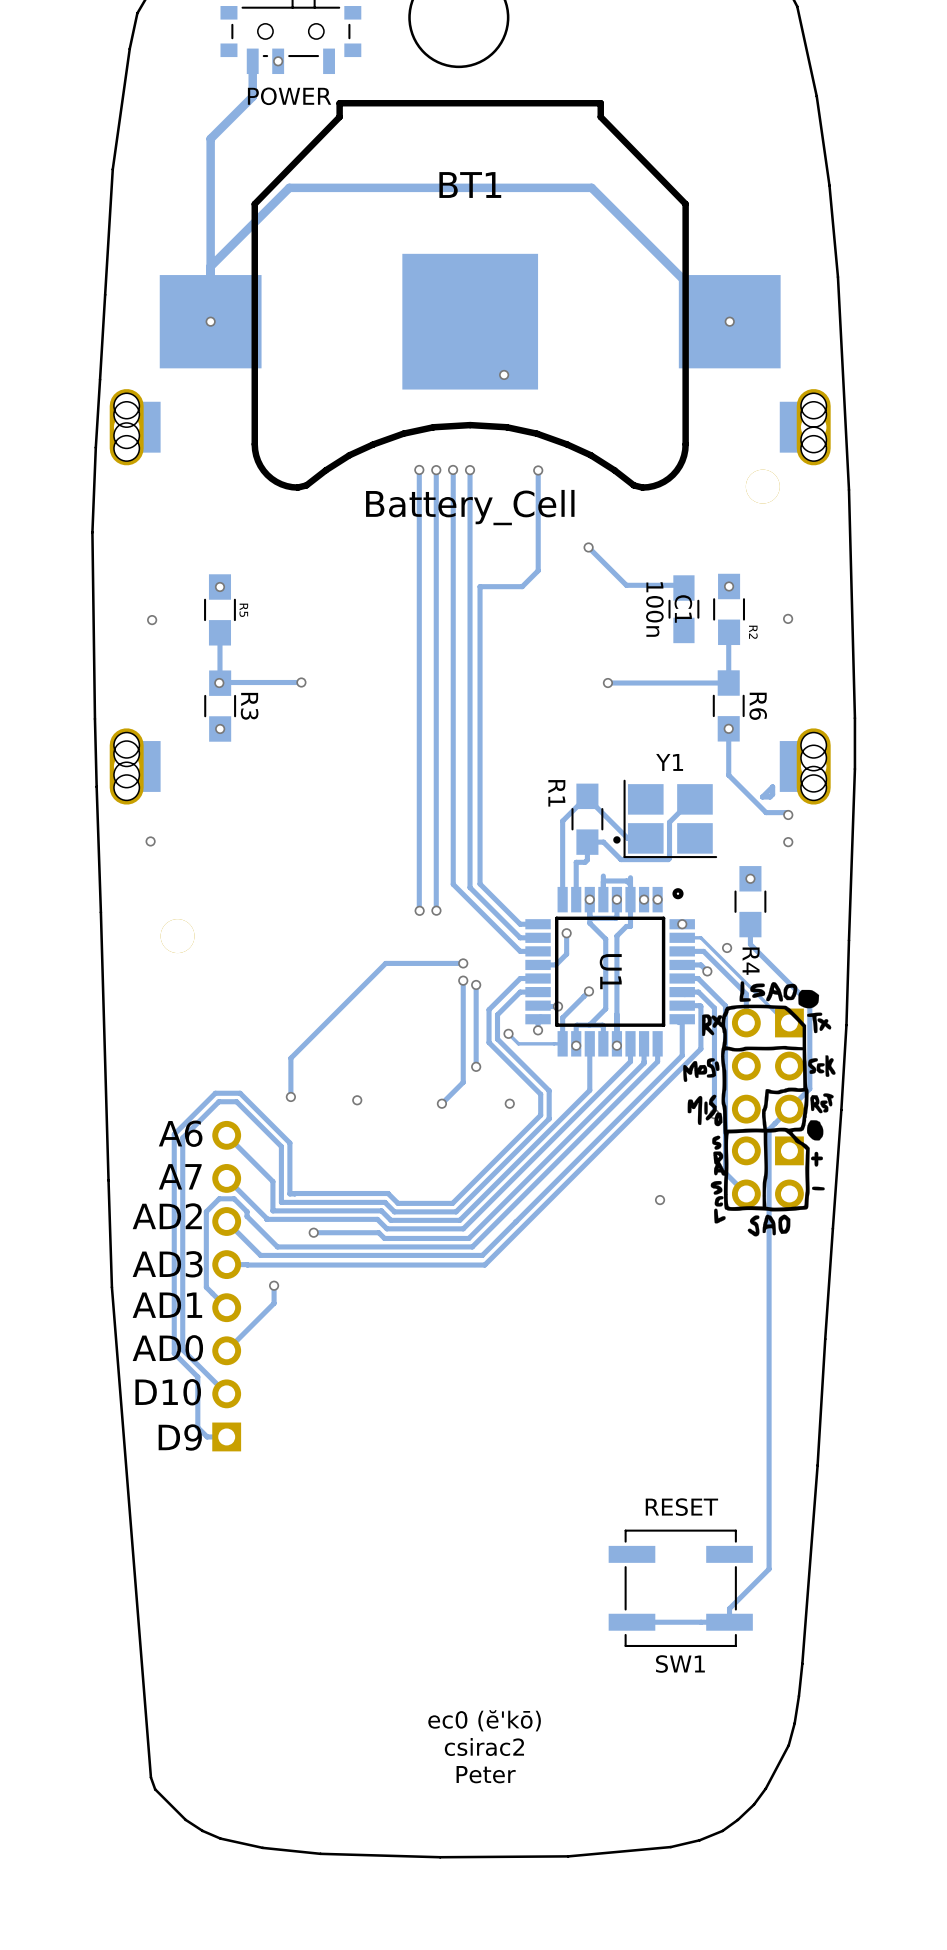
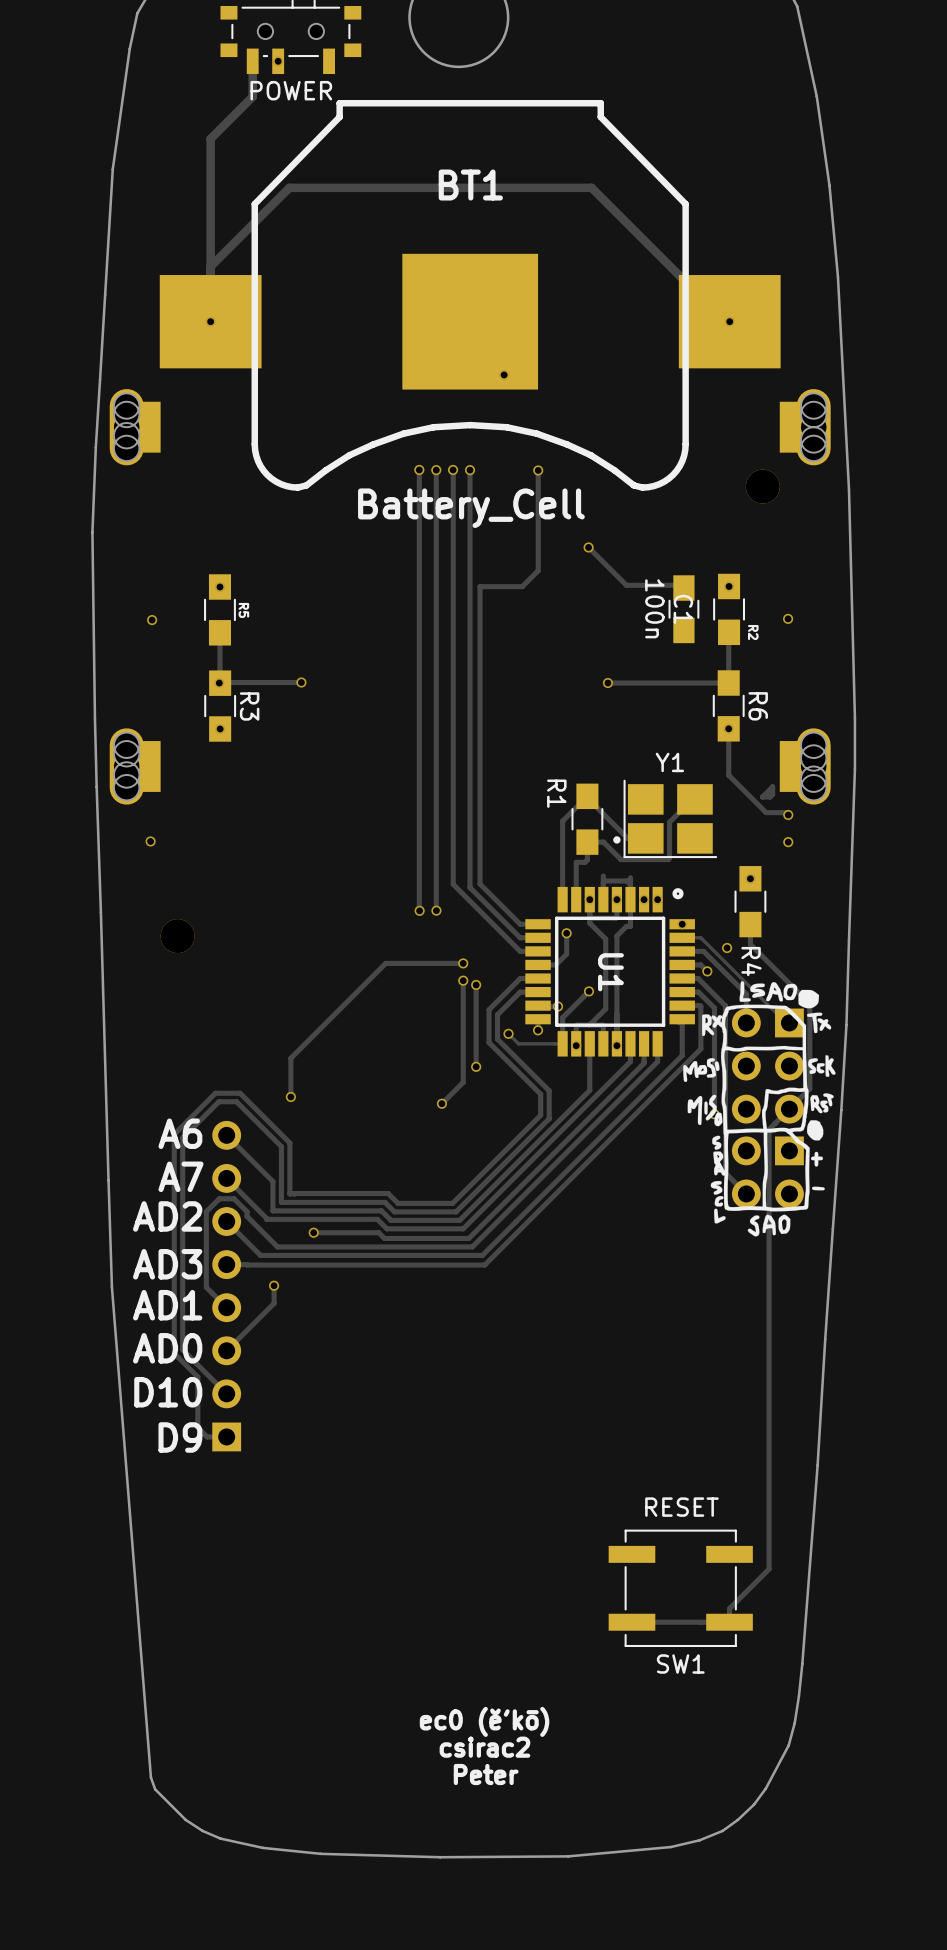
POWER name: none -> POWER (291, 90)
POWER text: POWER (289, 96) -> none
via: (357, 1100) -> none
via: (509, 1103) -> none
via: (660, 1200) -> none

